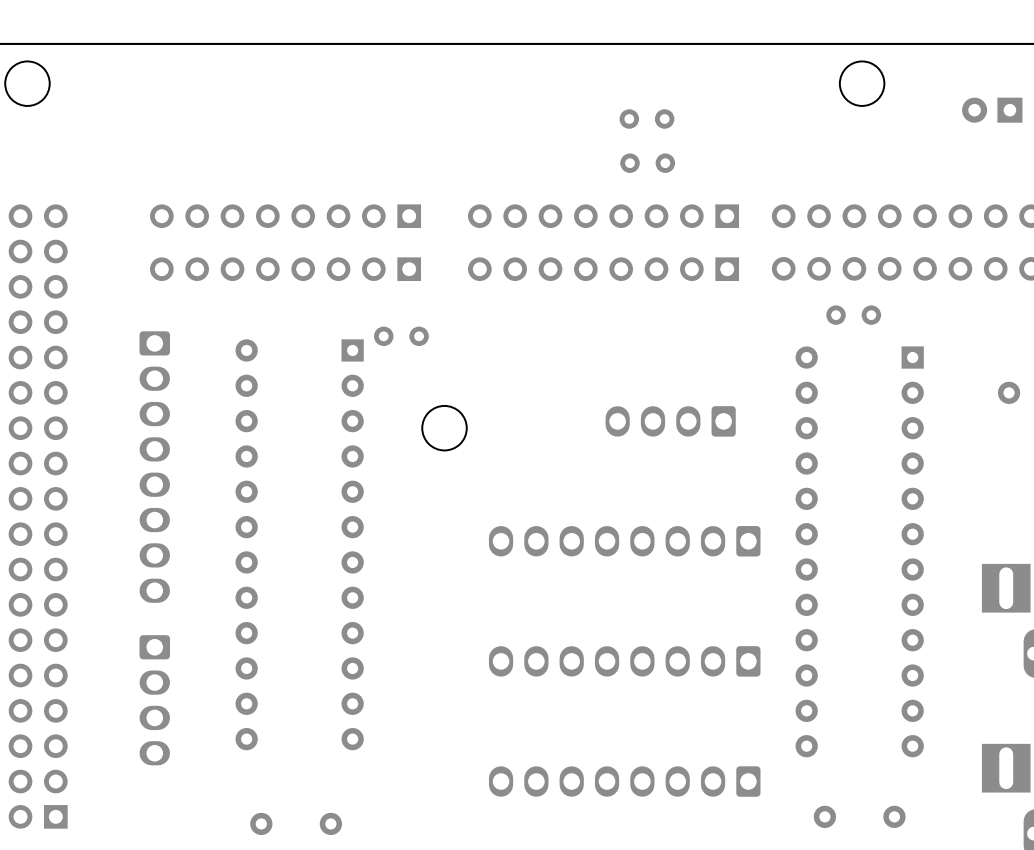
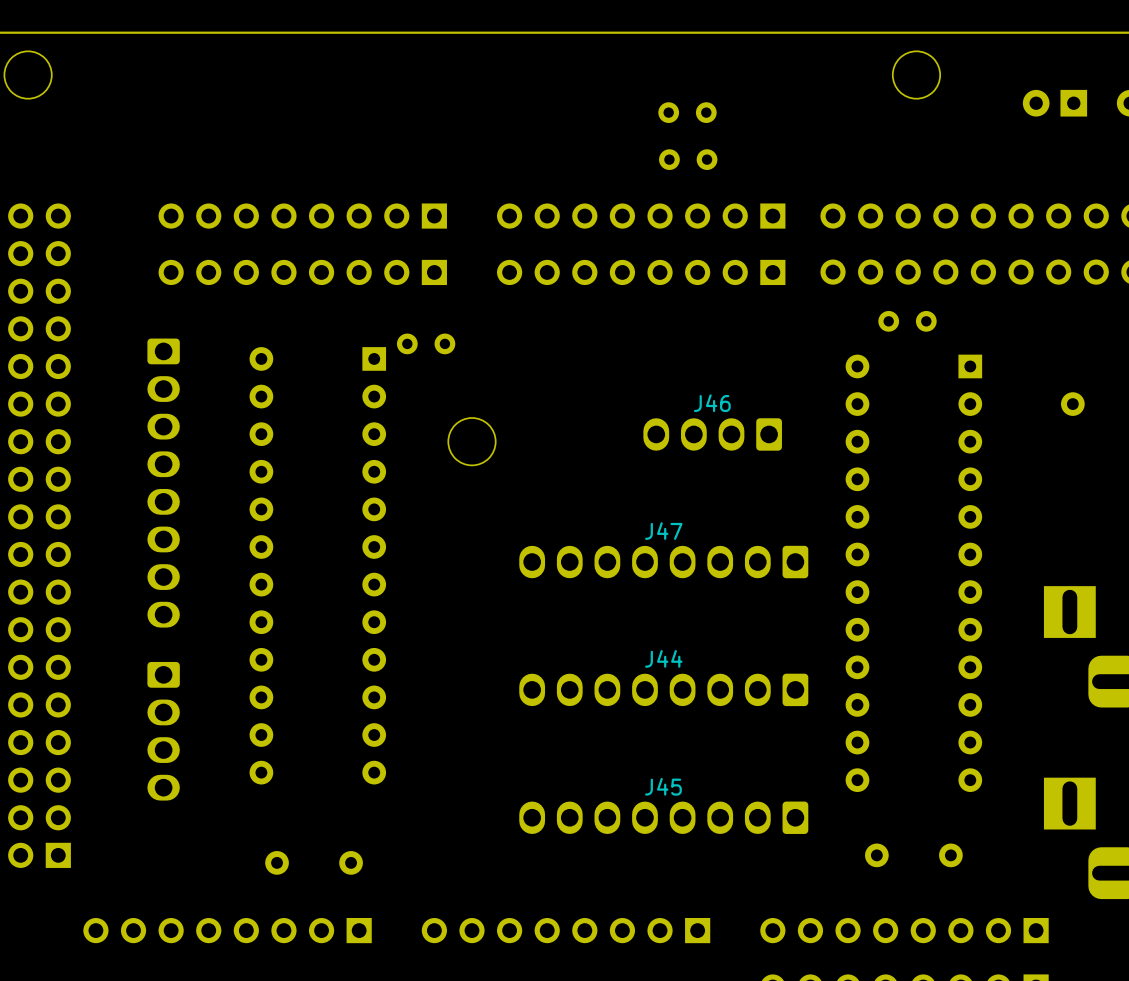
J46 name: none -> J46 (712, 403)
J47 name: none -> J47 (663, 531)
J44 name: none -> J44 (663, 658)
J45 name: none -> J45 (663, 786)

